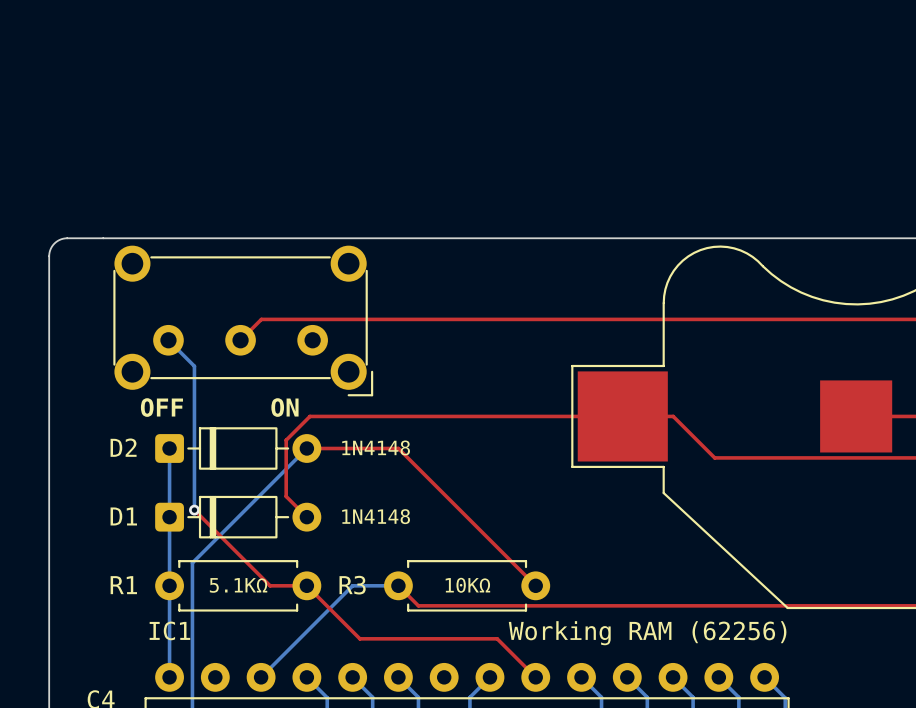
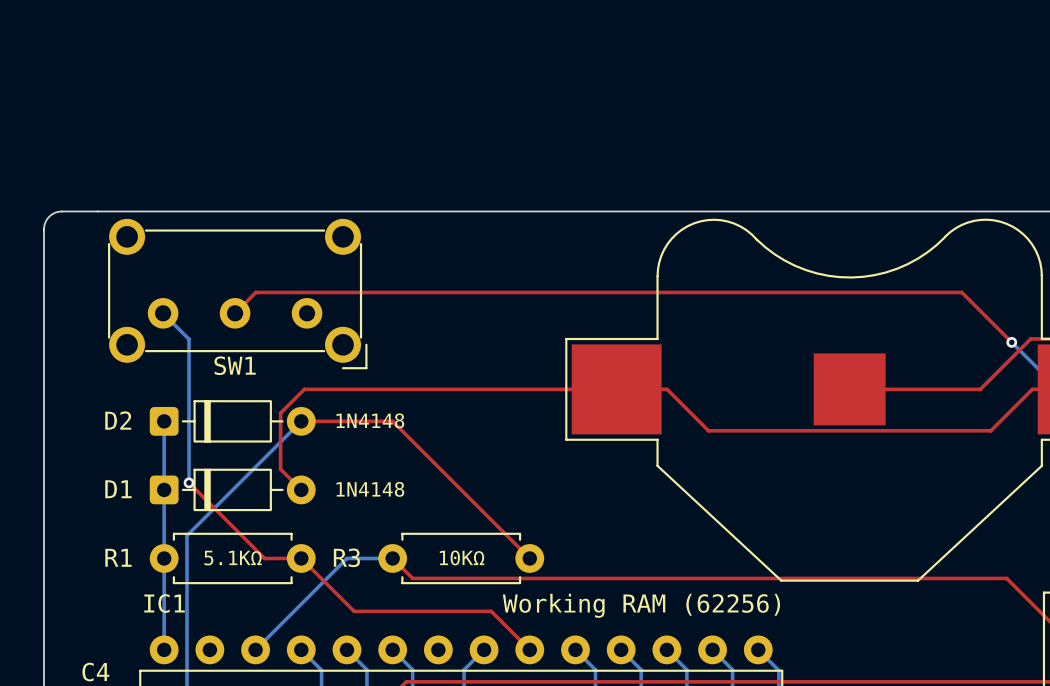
SW1 name: none -> SW1 (235, 365)
text: OFF (161, 407) -> none
text: ON (284, 407) -> none

